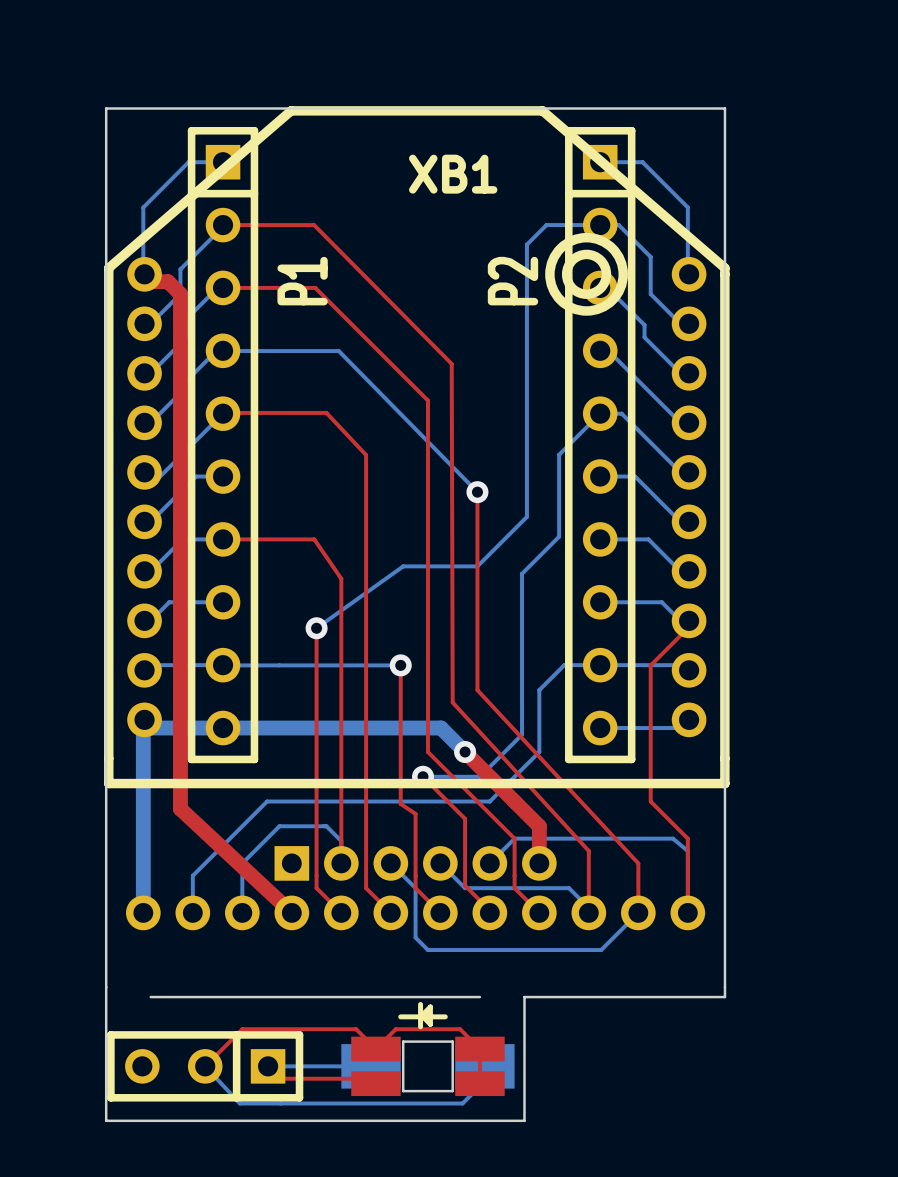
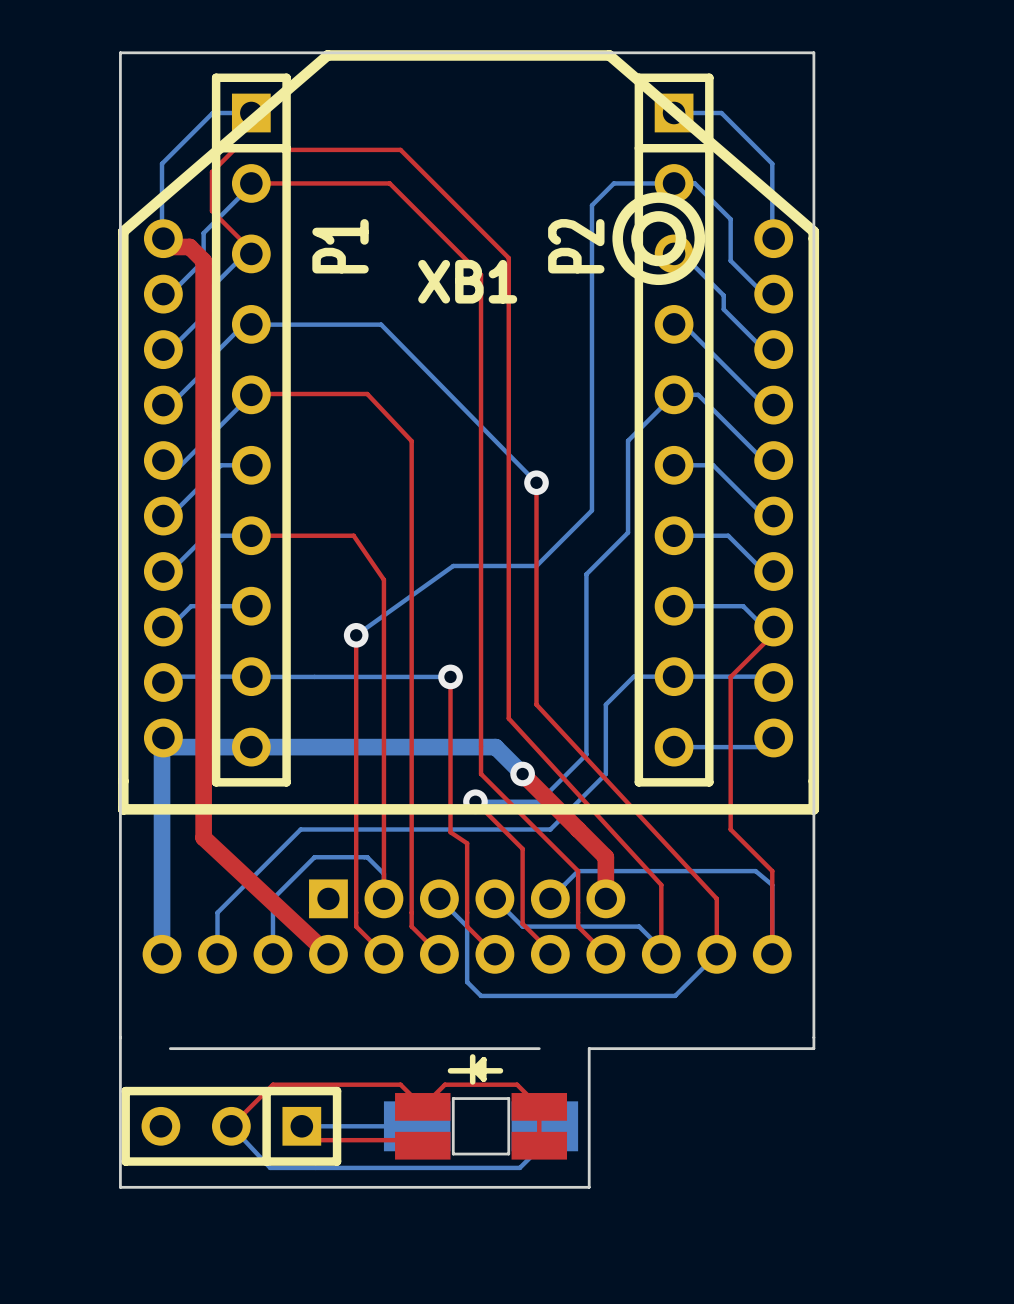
XB1 name position: XB1 (453, 174) -> XB1 (467, 281)
top track: (314, 225) (451, 363) -> (353, 183) (389, 183) (481, 274) (481, 380)
top track: (223, 287) (315, 287) (427, 400) -> none
top track: (451, 364) (452, 702) -> (251, 250) (211, 210) (211, 172) (234, 149) (400, 149) (508, 258) (508, 718)

